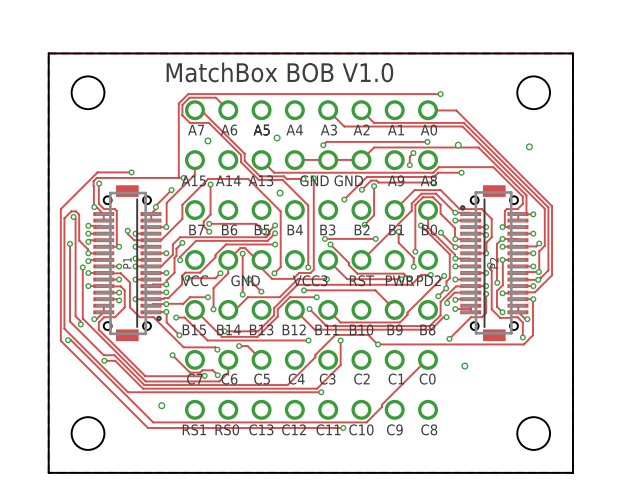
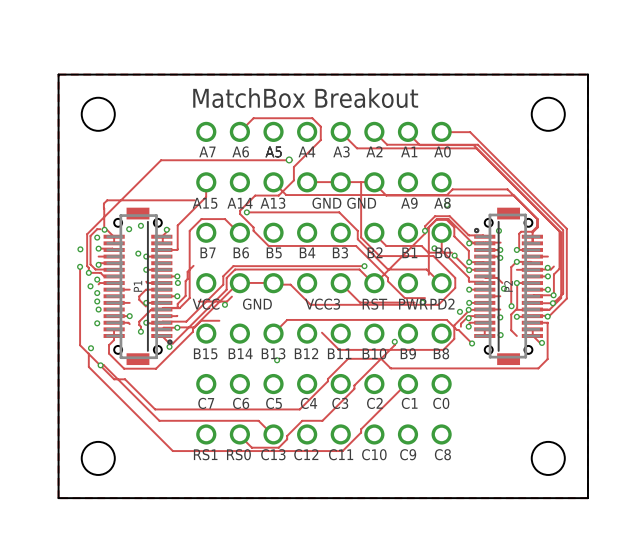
text: MatchBox BOB V1.0 (279, 72) -> none
text: none -> MatchBox Breakout (305, 98)
track: (440, 94) (188, 94) (178, 103) (178, 177) -> none
via: (440, 94) -> none
track: (194, 110) (201, 110) (244, 153) (244, 160) (260, 176) (303, 178) -> none
track: (228, 110) (215, 97) (189, 97) (182, 104) (182, 115) (189, 122) (208, 122) (241, 155) (241, 162) (258, 179) (282, 179) (308, 205) (308, 267) -> (239, 131) (253, 118) (312, 118) (320, 126) (320, 140) (293, 166) (293, 180) (278, 195) (255, 195) (240, 210) (240, 214) (253, 227) (253, 230) (268, 245) (356, 245) (388, 277) (388, 281) (404, 298) (425, 298)
track: none -> (407, 131) (419, 145) (473, 145) (561, 232) (561, 298) (549, 309) (515, 309)
via: (207, 140) -> none
track: (427, 141) (326, 141) (323, 145) -> none
via: (427, 141) -> none
via: (323, 145) -> none
via: (458, 145) -> none
via: (529, 146) -> none
track: (413, 153) (409, 156) (409, 165) -> none
via: (413, 153) -> none
track: (359, 159) (374, 147) (478, 147) (526, 195) (526, 213) (517, 214) (533, 214) -> (372, 182) (386, 195) (514, 195) (537, 219) (537, 227) (532, 232) (532, 243)
via: (409, 165) -> none
track: (131, 172) (97, 172) (60, 209) (60, 340) (147, 427) (343, 427) -> none
via: (131, 172) -> none
track: (461, 172) (438, 172) (434, 176) (366, 176) (344, 199) -> none
via: (461, 172) -> none
via: (183, 177) -> none
via: (303, 178) -> none
track: (313, 178) (313, 269) (310, 272) (299, 272) (293, 278) (272, 278) (261, 268) (261, 260) -> none
via: (313, 178) -> none
track: (433, 182) (378, 182) (371, 180) (361, 189) -> none
track: (99, 183) (98, 203) (104, 209) (114, 209) (116, 211) (116, 246) (119, 246) (103, 246) -> (100, 229) (97, 229) (90, 235) (90, 264) (95, 269) (114, 269)
via: (99, 183) -> none
track: (210, 184) (210, 214) (203, 221) (203, 226) (209, 231) -> none
via: (210, 184) -> none
track: (374, 186) (374, 215) (364, 224) -> none
via: (374, 186) -> none
track: none -> (246, 212) (339, 212) (357, 230) (357, 239) (388, 269) (426, 269) (441, 283)
via: none -> (246, 212)
via: (361, 189) -> none
track: (171, 190) (156, 205) (155, 209) (150, 214) (150, 220) -> (169, 229) (161, 236) (161, 243)
via: (171, 190) -> none
via: (280, 193) -> none
via: (344, 199) -> none
via: none -> (140, 225)
via: none -> (129, 229)
track: none -> (425, 230) (436, 219) (448, 219) (472, 242) (500, 242)
via: none -> (425, 230)
via: none -> (498, 230)
track: none -> (239, 232) (224, 219) (201, 219) (189, 230) (189, 298) (179, 308) (151, 309) (139, 321) (140, 331)
track: none -> (374, 232) (386, 245) (421, 245) (428, 252) (451, 252)
track: (394, 210) (414, 190) (440, 190) (459, 209) (481, 209) (491, 218) (491, 237) (486, 242) (486, 253) (470, 253) -> (502, 282) (497, 277) (484, 276)
via: (455, 212) -> none
via: none -> (97, 237)
via: (533, 214) -> none
track: (73, 216) (75, 218) (75, 316) (80, 321) (80, 324) -> none
via: (73, 216) -> none
track: (209, 223) (256, 223) (263, 231) -> none
via: (209, 223) -> none
via: (364, 224) -> none
track: (275, 225) (266, 237) (180, 237) (172, 244) (172, 254) (161, 266) (150, 266) -> none
via: (275, 225) -> none
track: (420, 225) (449, 254) (449, 278) (446, 281) (446, 288) (438, 296) -> none
via: none -> (80, 249)
via: (166, 227) -> none
track: (127, 230) (127, 233) (134, 240) (161, 239) (182, 218) (182, 204) (208, 178) (248, 178) (280, 211) (280, 267) (274, 273) -> none
via: (209, 231) -> none
via: (263, 231) -> none
track: (398, 231) (398, 242) (413, 257) (413, 266) -> none
via: (398, 231) -> none
via: (88, 233) -> none
track: (275, 233) (267, 240) (196, 240) (180, 256) (180, 260) -> none
via: (275, 233) -> none
via: (533, 233) -> none
track: (324, 238) (375, 238) -> none
via: (324, 238) -> none
via: (375, 238) -> none
via: (182, 242) -> none
track: none -> (364, 266) (233, 266) (223, 276) (223, 284) (186, 321) (145, 323)
via: none -> (364, 266)
via: (539, 243) -> none
track: (275, 244) (225, 244) (200, 272) (185, 272) (182, 275) (182, 284) (168, 297) (135, 299) -> none
via: (275, 244) -> none
track: (330, 244) (357, 273) (403, 273) (409, 279) -> none
via: (330, 244) -> none
via: none -> (547, 267)
via: (119, 246) -> none
via: (502, 246) -> none
via: none -> (88, 272)
via: (415, 251) -> none
via: (88, 253) -> none
track: (103, 253) (88, 253) (88, 249) (79, 240) (79, 214) (75, 211) (71, 211) (64, 218) (64, 328) (128, 392) (321, 392) -> (114, 276) (103, 276) (100, 272) (88, 272) (87, 234) (161, 160) (292, 160)
track: (242, 253) (242, 294) -> none
via: (242, 253) -> none
via: (486, 253) -> none
via: none -> (97, 279)
via: (135, 258) -> none
via: (455, 258) -> none
via: none -> (177, 282)
track: (261, 259) (256, 259) (244, 248) (240, 248) (228, 260) (228, 273) (213, 288) (213, 309) -> none
via: (180, 260) -> none
via: (88, 261) -> none
via: none -> (90, 286)
track: (489, 265) (491, 270) (491, 309) (500, 317) (517, 317) (522, 322) (522, 337) -> none
via: (119, 266) -> none
track: none -> (146, 289) (139, 296) (139, 299) (145, 306)
via: (135, 266) -> none
via: (413, 266) -> none
track: (82, 267) (82, 318) (145, 381) (219, 381) (228, 372) (228, 359) -> none
via: (82, 267) -> none
via: (308, 267) -> none
via: none -> (97, 293)
track: (88, 272) (120, 273) (129, 282) (129, 307) (139, 317) (153, 317) (183, 347) (215, 347) (217, 349) -> none
via: (88, 272) -> none
via: (486, 272) -> none
via: (220, 273) -> none
via: (274, 273) -> none
track: (430, 274) (421, 274) (411, 284) (297, 284) (274, 308) (274, 315) (258, 331) (224, 331) -> none
via: (430, 274) -> none
track: (444, 275) (399, 322) (340, 322) (328, 309) -> none
via: (444, 275) -> none
via: none -> (97, 301)
via: (187, 278) -> none
via: (119, 279) -> none
track: (249, 279) (261, 291) -> none
via: (249, 279) -> none
track: (326, 279) (297, 279) (279, 297) (247, 297) (235, 309) (228, 309) -> none
via: (326, 279) -> none
via: (401, 279) -> none
via: none -> (224, 304)
via: (166, 284) -> none
track: (88, 286) (120, 286) (124, 290) (124, 307) (114, 317) (104, 317) (98, 322) (98, 329) (145, 376) (204, 375) -> none
via: none -> (468, 309)
via: (486, 286) -> none
via: (533, 286) -> none
track: (303, 290) (375, 290) (394, 309) -> none
via: (303, 290) -> none
via: (261, 291) -> none
via: (166, 292) -> none
track: (486, 293) (486, 312) (481, 317) (471, 317) (449, 338) -> none
via: none -> (547, 316)
via: (242, 294) -> none
via: none -> (468, 318)
via: (438, 296) -> none
via: (207, 297) -> none
track: (316, 297) (289, 297) (277, 309) (277, 316) (257, 336) (222, 336) (195, 310) -> none
via: (316, 297) -> none
via: none -> (97, 323)
via: (455, 299) -> none
via: (533, 299) -> none
via position: (119, 300) -> (140, 331)
via: (447, 303) -> none
via: none -> (468, 326)
track: (103, 305) (103, 312) (94, 319) -> (114, 329) (114, 340) (109, 345) (109, 353) (124, 368) (156, 368) (238, 282) (290, 284) (310, 304) (438, 304) (455, 288) (455, 277) (433, 256) (379, 256) (361, 237) (361, 182)
via: (213, 309) -> none
track: none -> (273, 333) (287, 319) (446, 319) (472, 343)
track: (294, 309) (314, 329) (431, 329) (443, 317) (446, 317) -> none
via: (309, 309) -> none
track: (455, 309) (470, 309) -> none
via: (455, 309) -> none
via: (166, 311) -> none
via: none -> (500, 335)
track: (150, 312) (166, 311) (166, 322) (179, 335) -> (161, 335) (169, 343) (172, 343) (226, 289) (226, 277) (235, 269) (359, 269) (374, 283)
via: (502, 312) -> none
track: (176, 317) (184, 317) (207, 340) (308, 340) -> none
via: (176, 317) -> none
via: (446, 317) -> none
track: none -> (394, 341) (394, 345) (322, 420) (302, 420) (278, 447) (251, 447) (239, 434)
via: none -> (394, 341)
via: (94, 319) -> none
via: none -> (472, 343)
via: none -> (169, 346)
track: none -> (88, 353) (88, 367) (172, 451) (342, 451) (361, 432) (361, 429) (407, 384)
via: (224, 331) -> none
via: (179, 335) -> none
via: none -> (277, 360)
via: (522, 337) -> none
via: (449, 338) -> none
track: (68, 340) (70, 340) (153, 422) (366, 422) (428, 359) -> none
via: (68, 340) -> none
via: (308, 340) -> none
track: (340, 340) (340, 365) (317, 388) (143, 388) (115, 360) (104, 360) -> none
via: (340, 340) -> none
track: none -> (100, 365) (103, 365) (159, 420) (258, 420) (273, 434)
via: none -> (100, 365)
via: (378, 344) -> none
track: (239, 346) (247, 346) (261, 359) -> none
via: (239, 346) -> none
via: (217, 349) -> none
track: (172, 355) (189, 372) (212, 370) (217, 375) -> none
via: (172, 355) -> none
via: (104, 360) -> none
via: (464, 366) -> none
via: (204, 375) -> none
via: (217, 375) -> none
via: (321, 392) -> none
via: (161, 405) -> none
via: (343, 427) -> none

